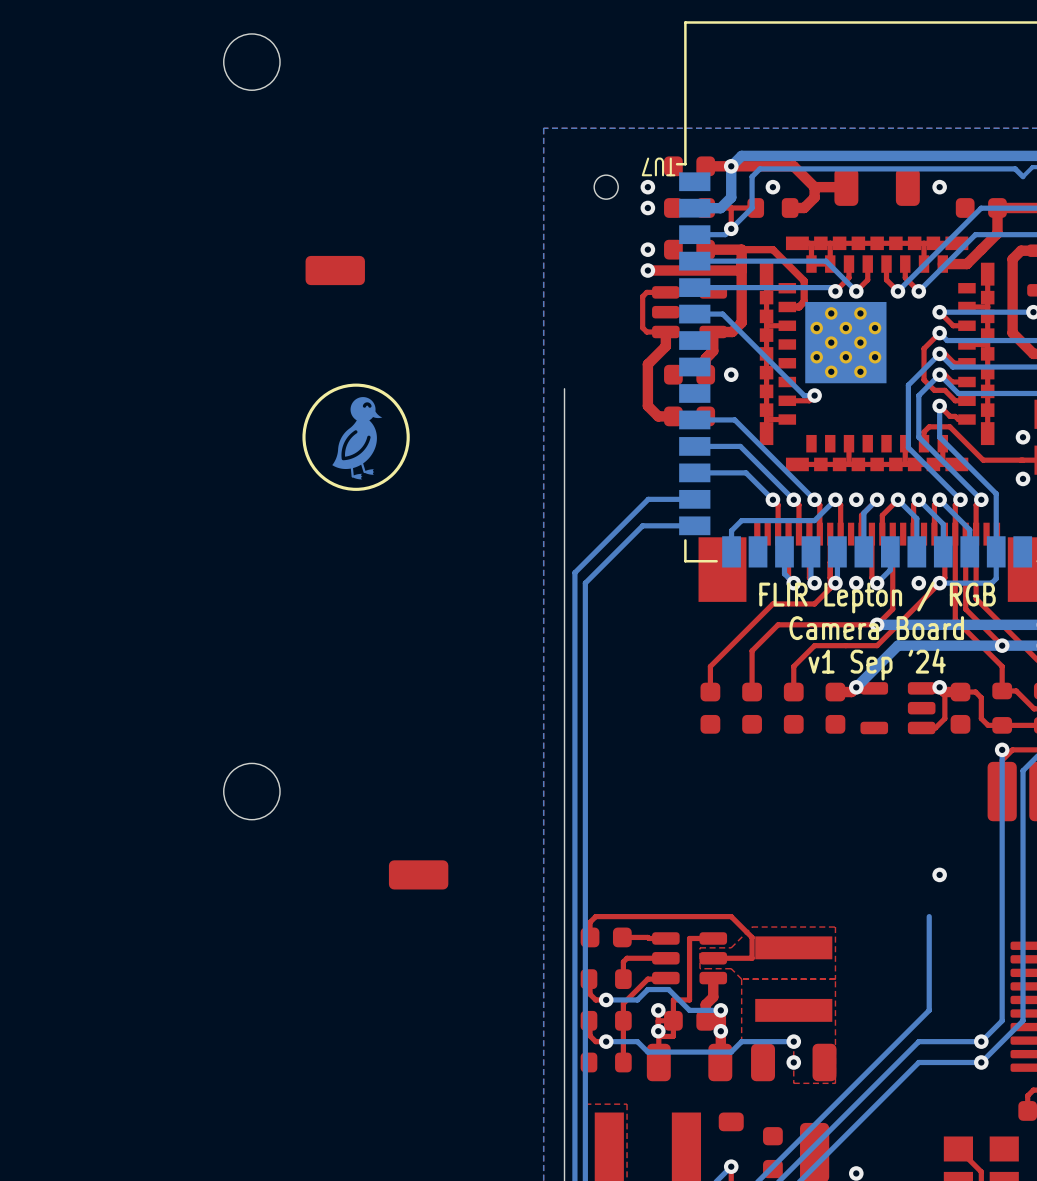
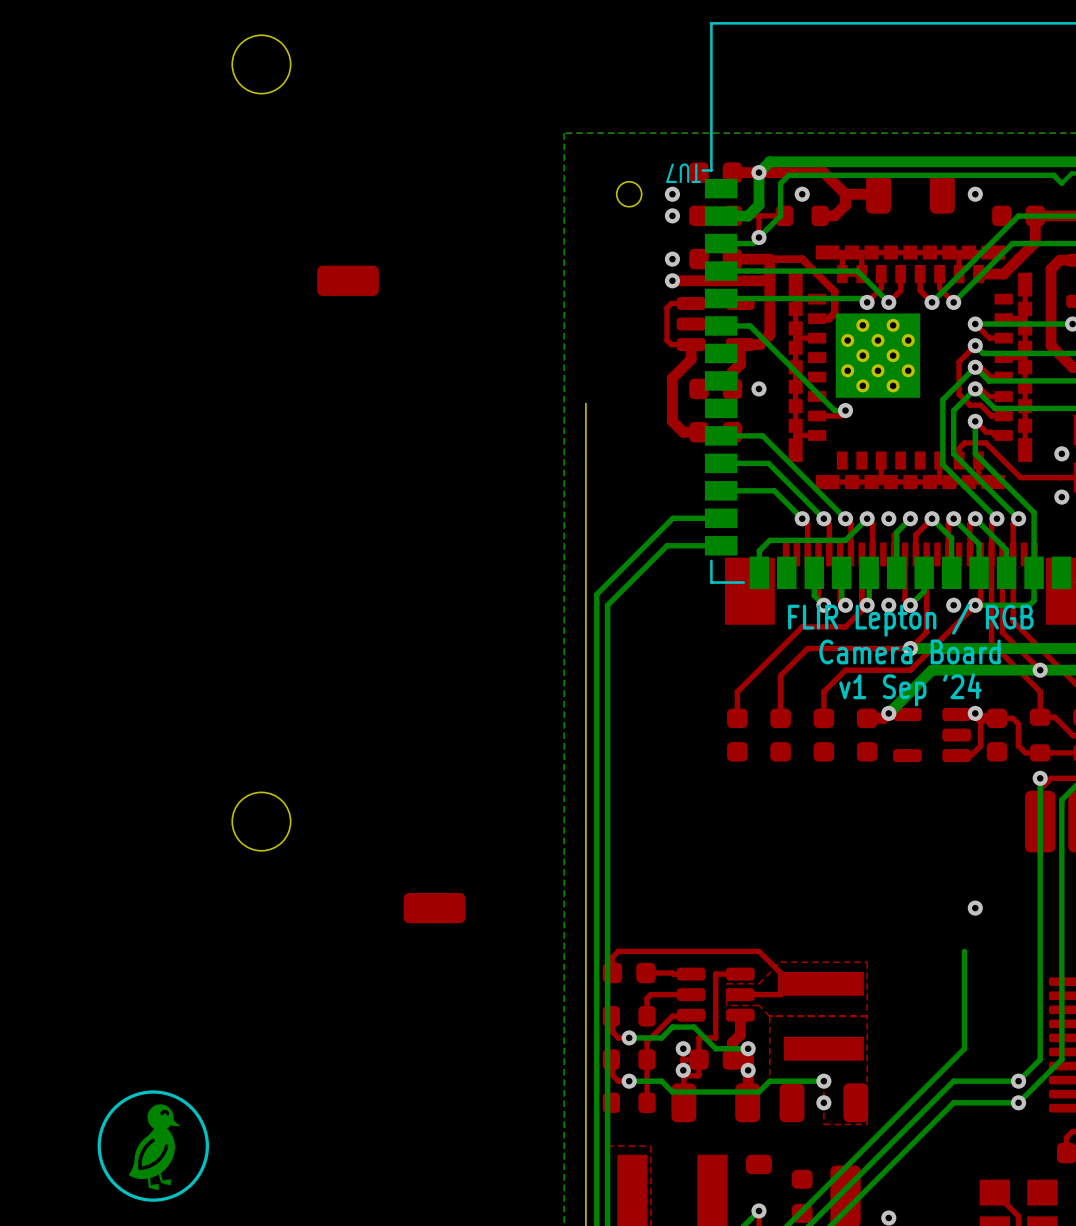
part: (356, 437) -> none
part: none -> (153, 1146)

